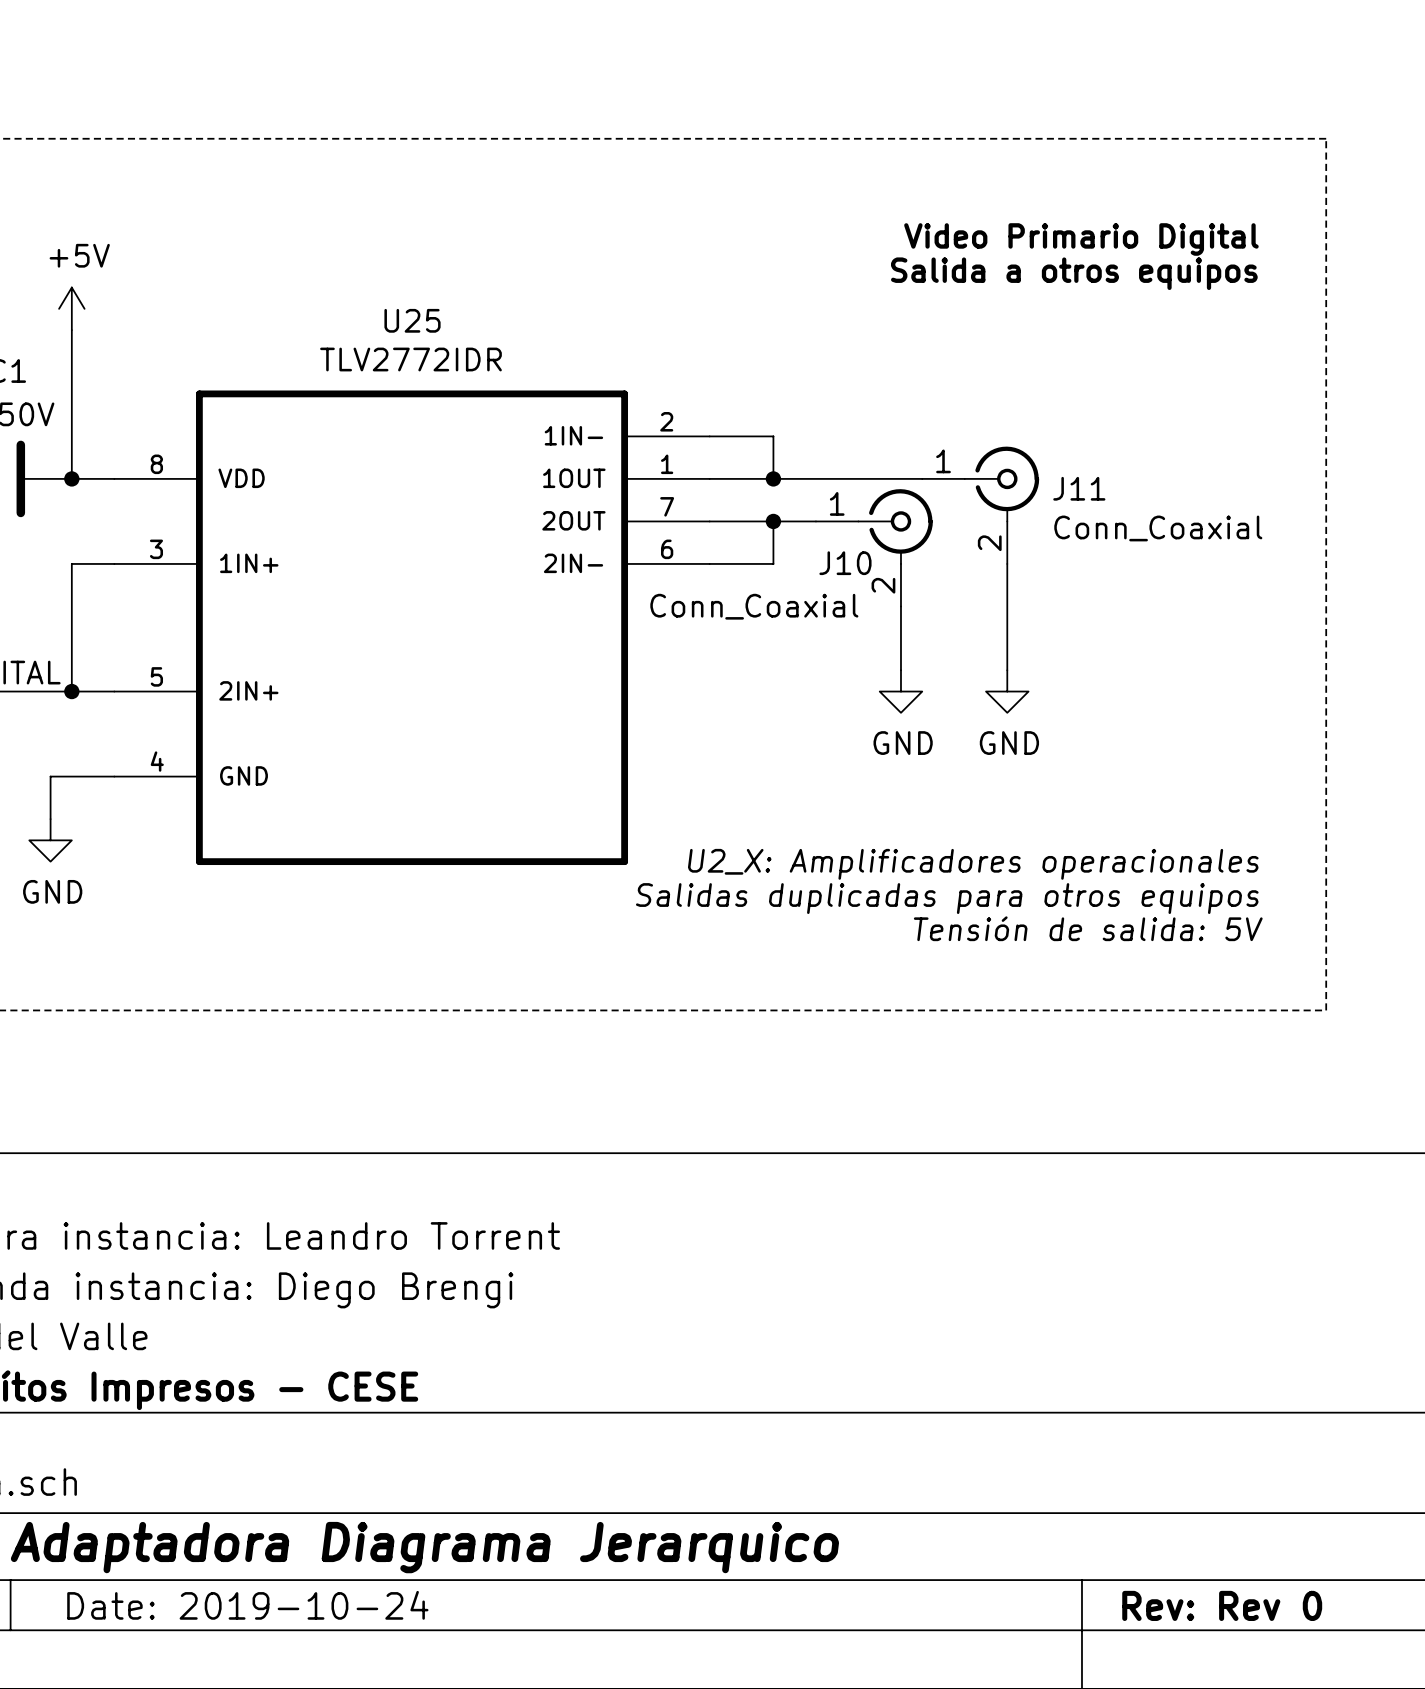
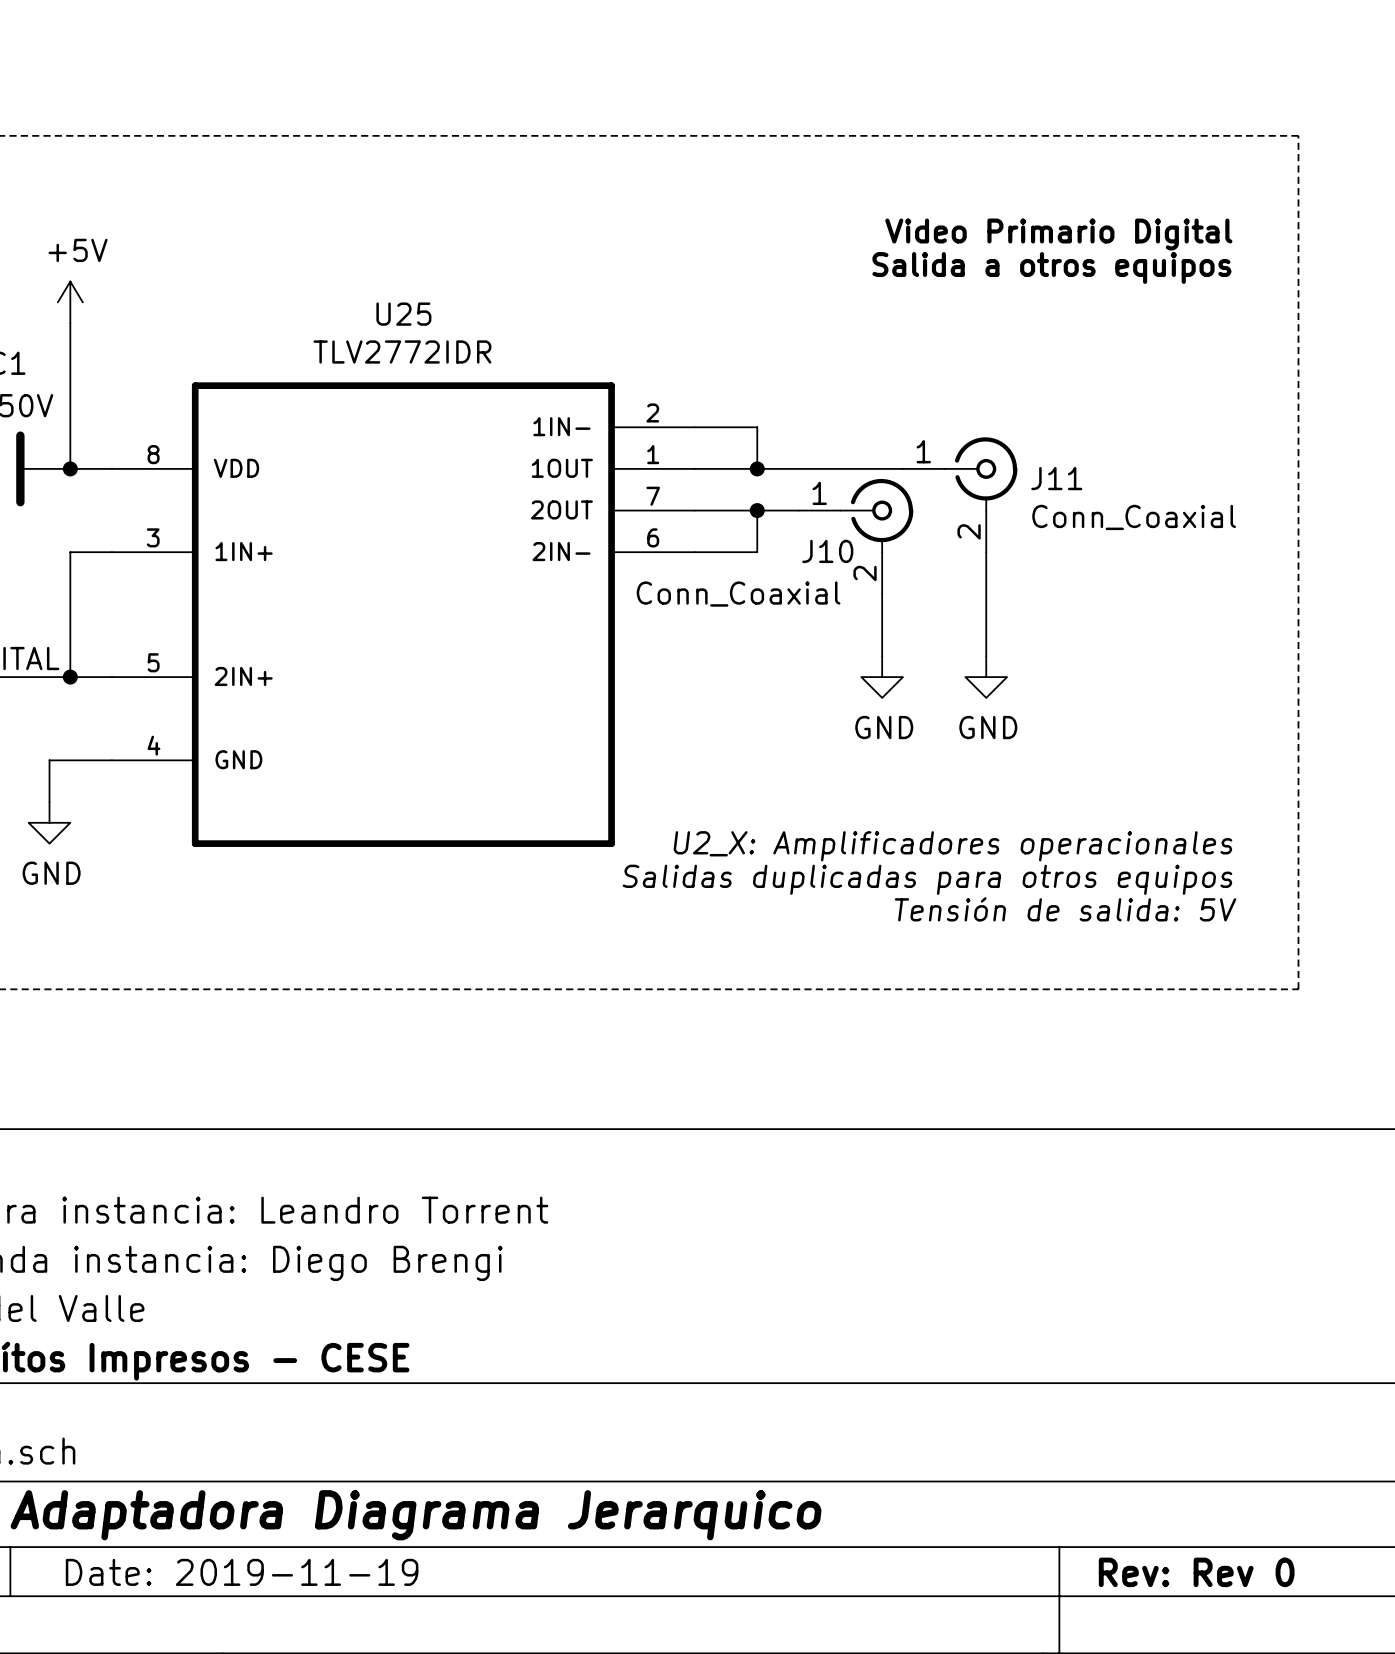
title block: Date: 2019-10-24 (247, 1605) -> Date: 2019-11-19 (242, 1572)

